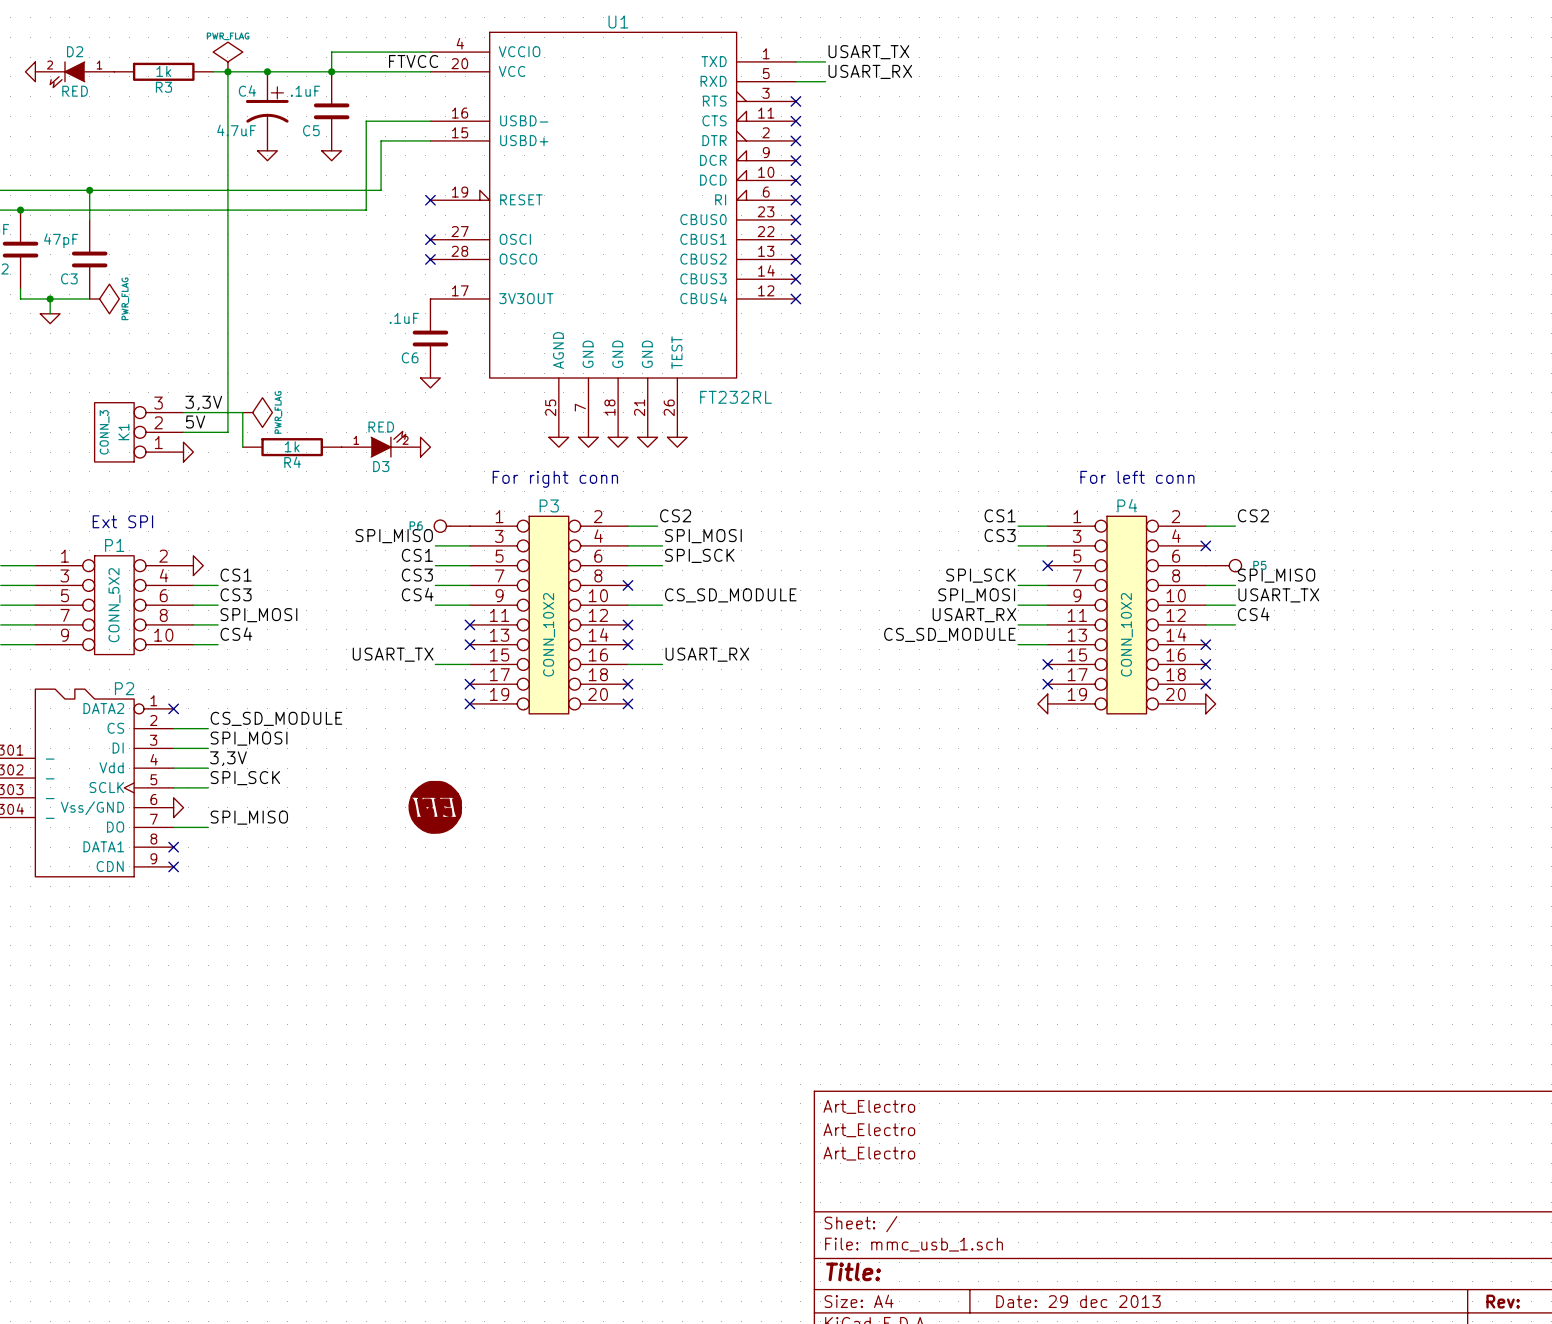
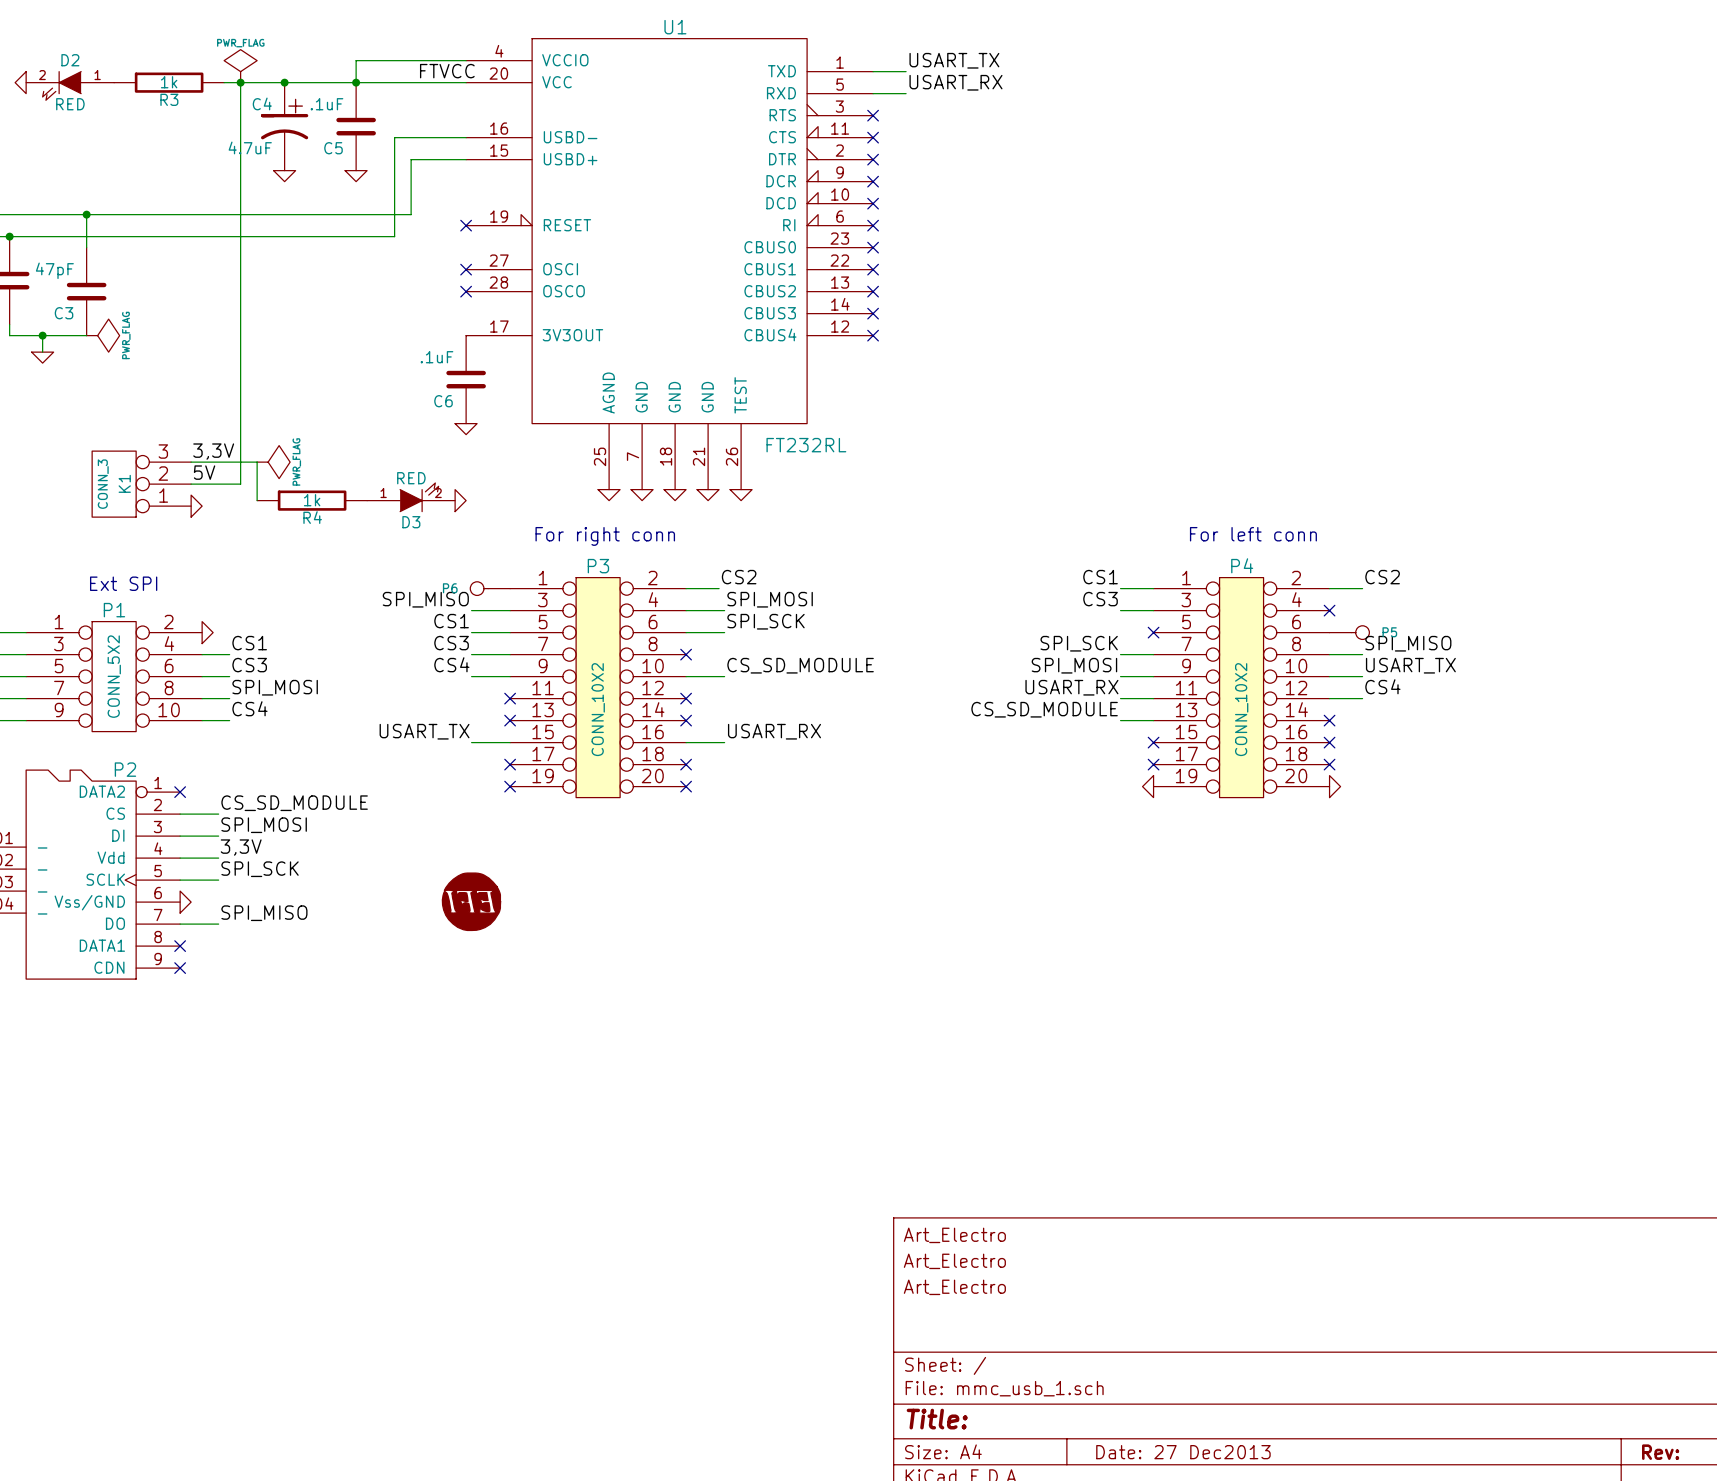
title block: Date: 29 dec 2013 (1078, 1301) -> Date: 27 Dec2013 (1183, 1452)

